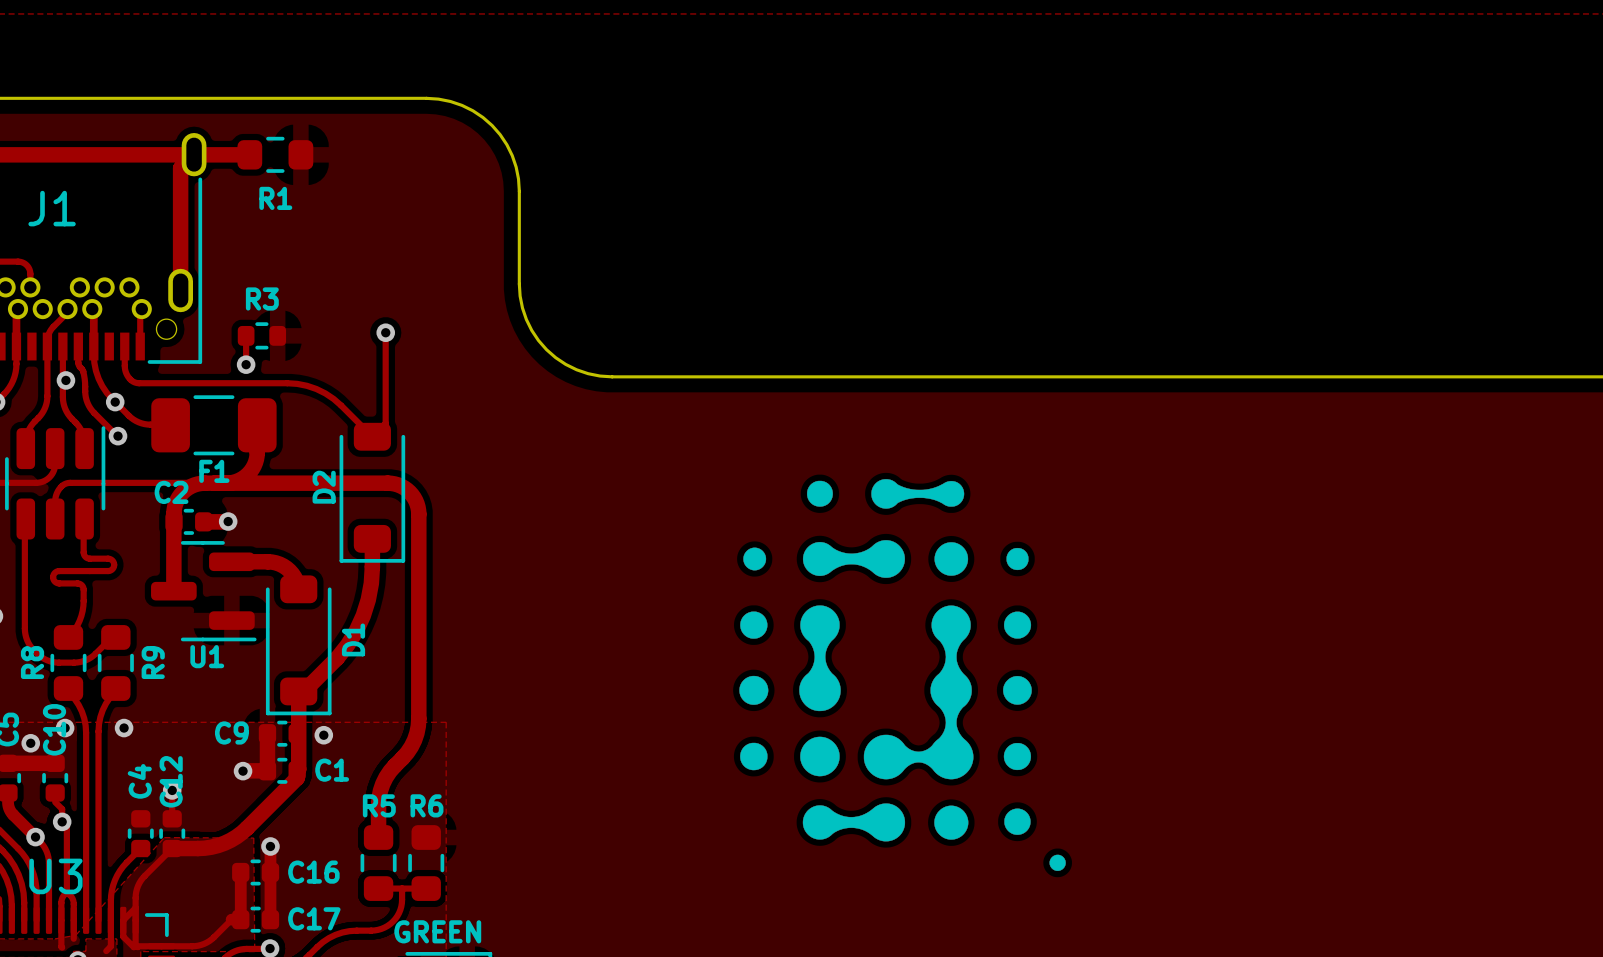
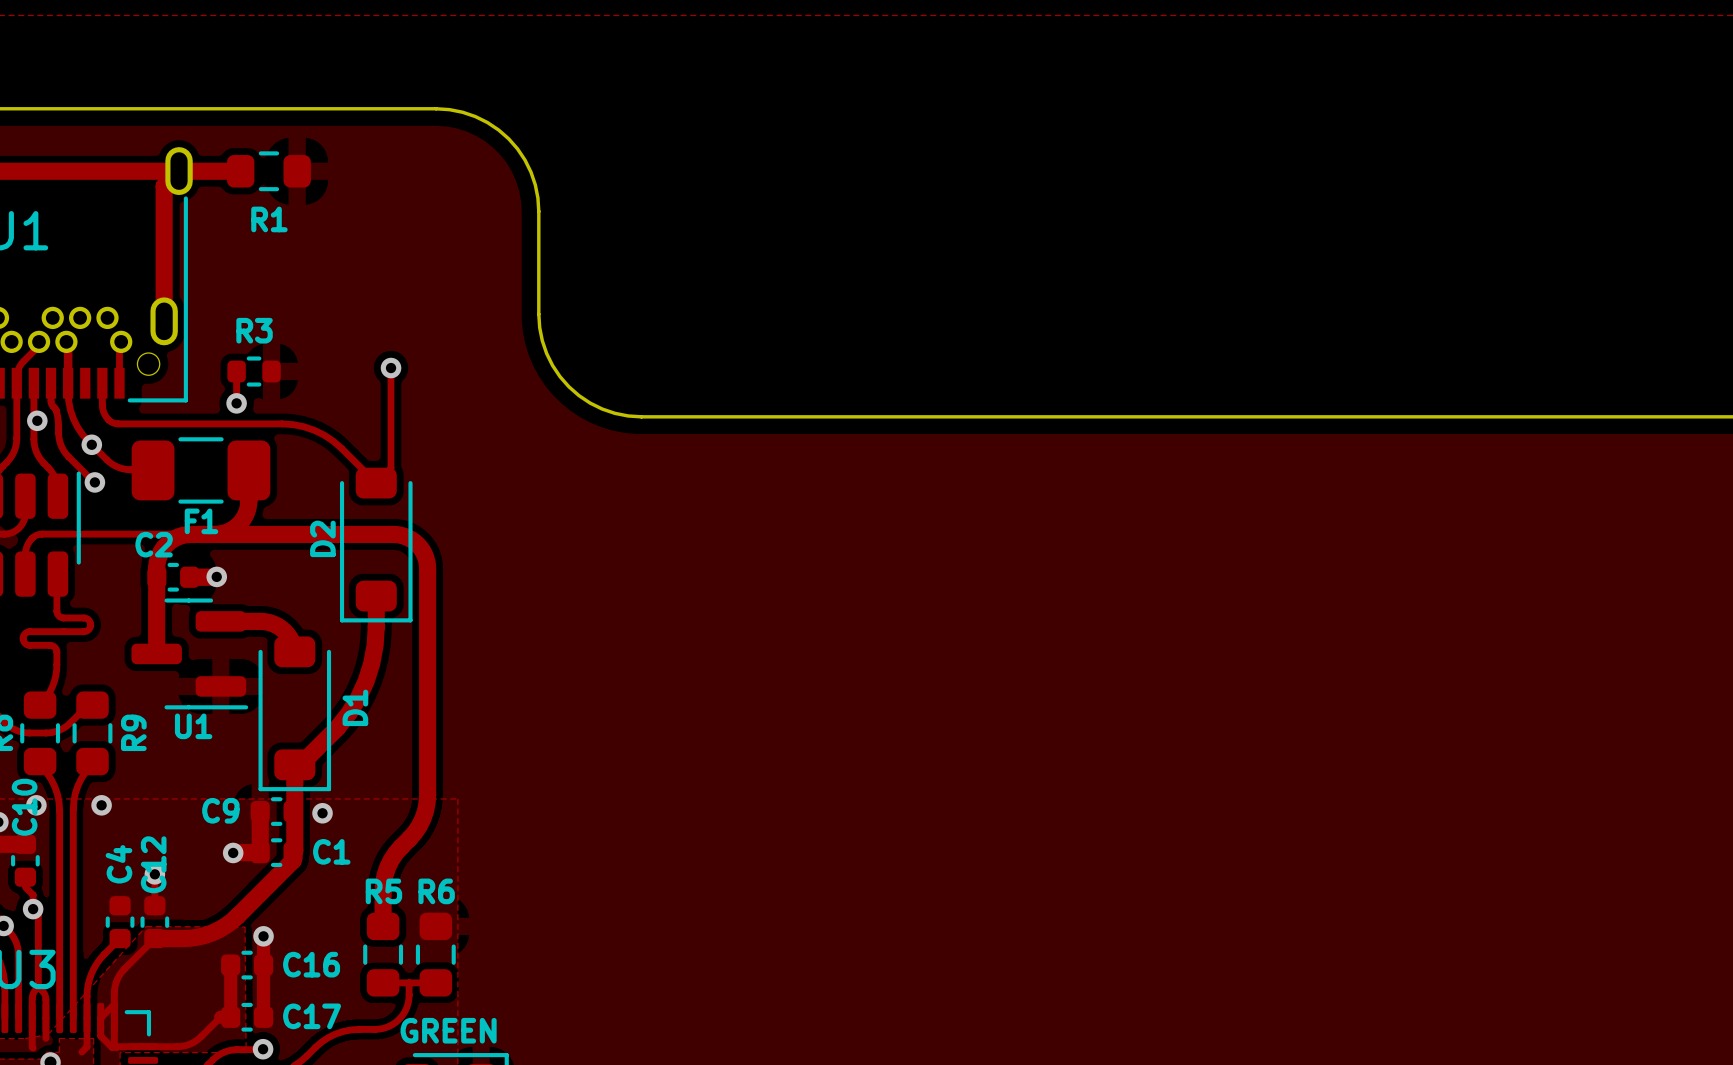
drawing: [739, 479, 1066, 871] -> none

